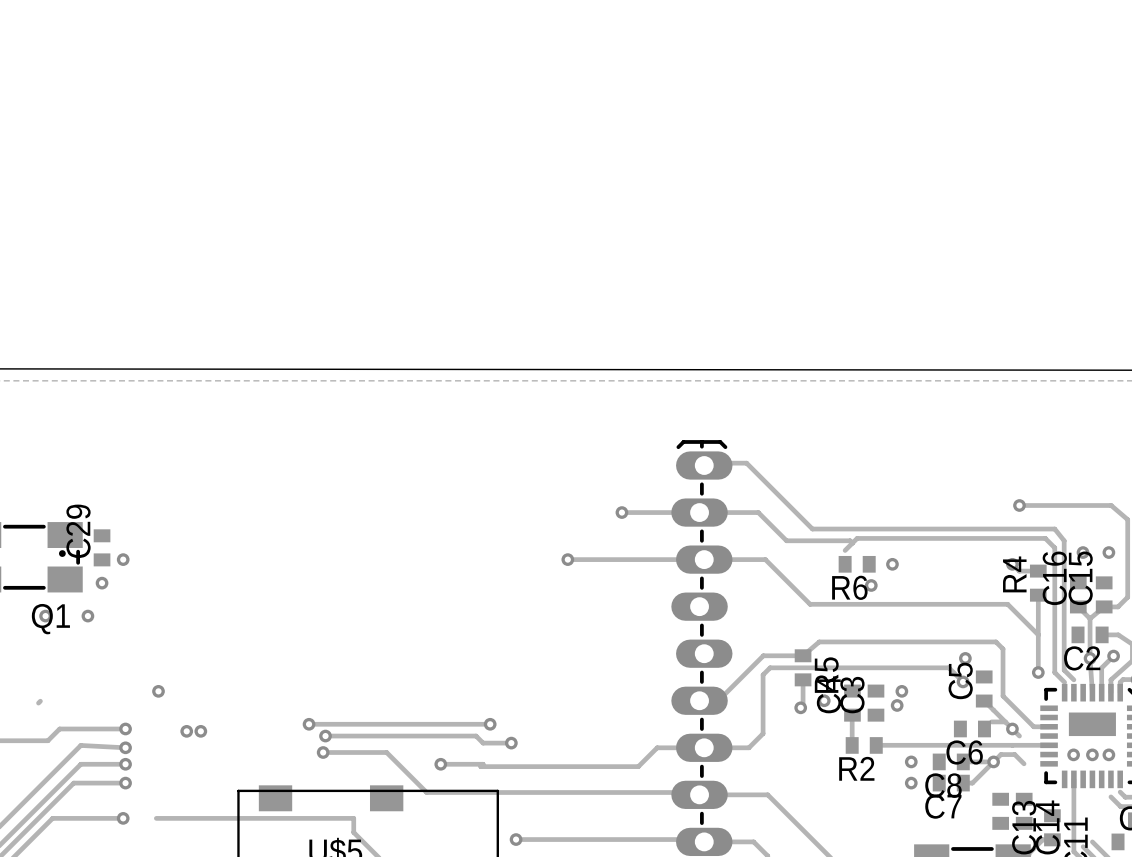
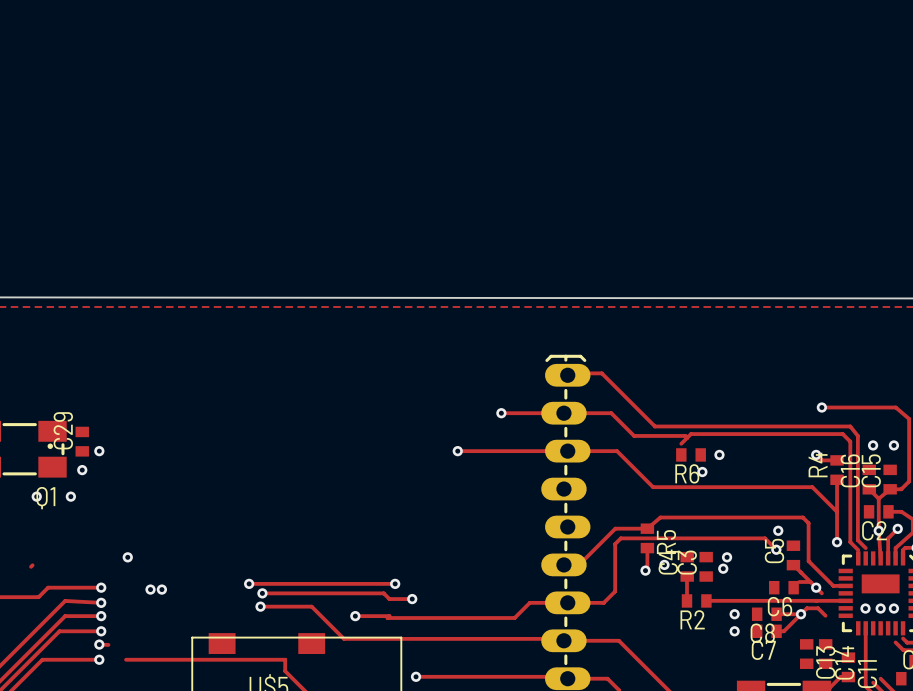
track: none -> (99, 644) (108, 644)
via: none -> (99, 644)

